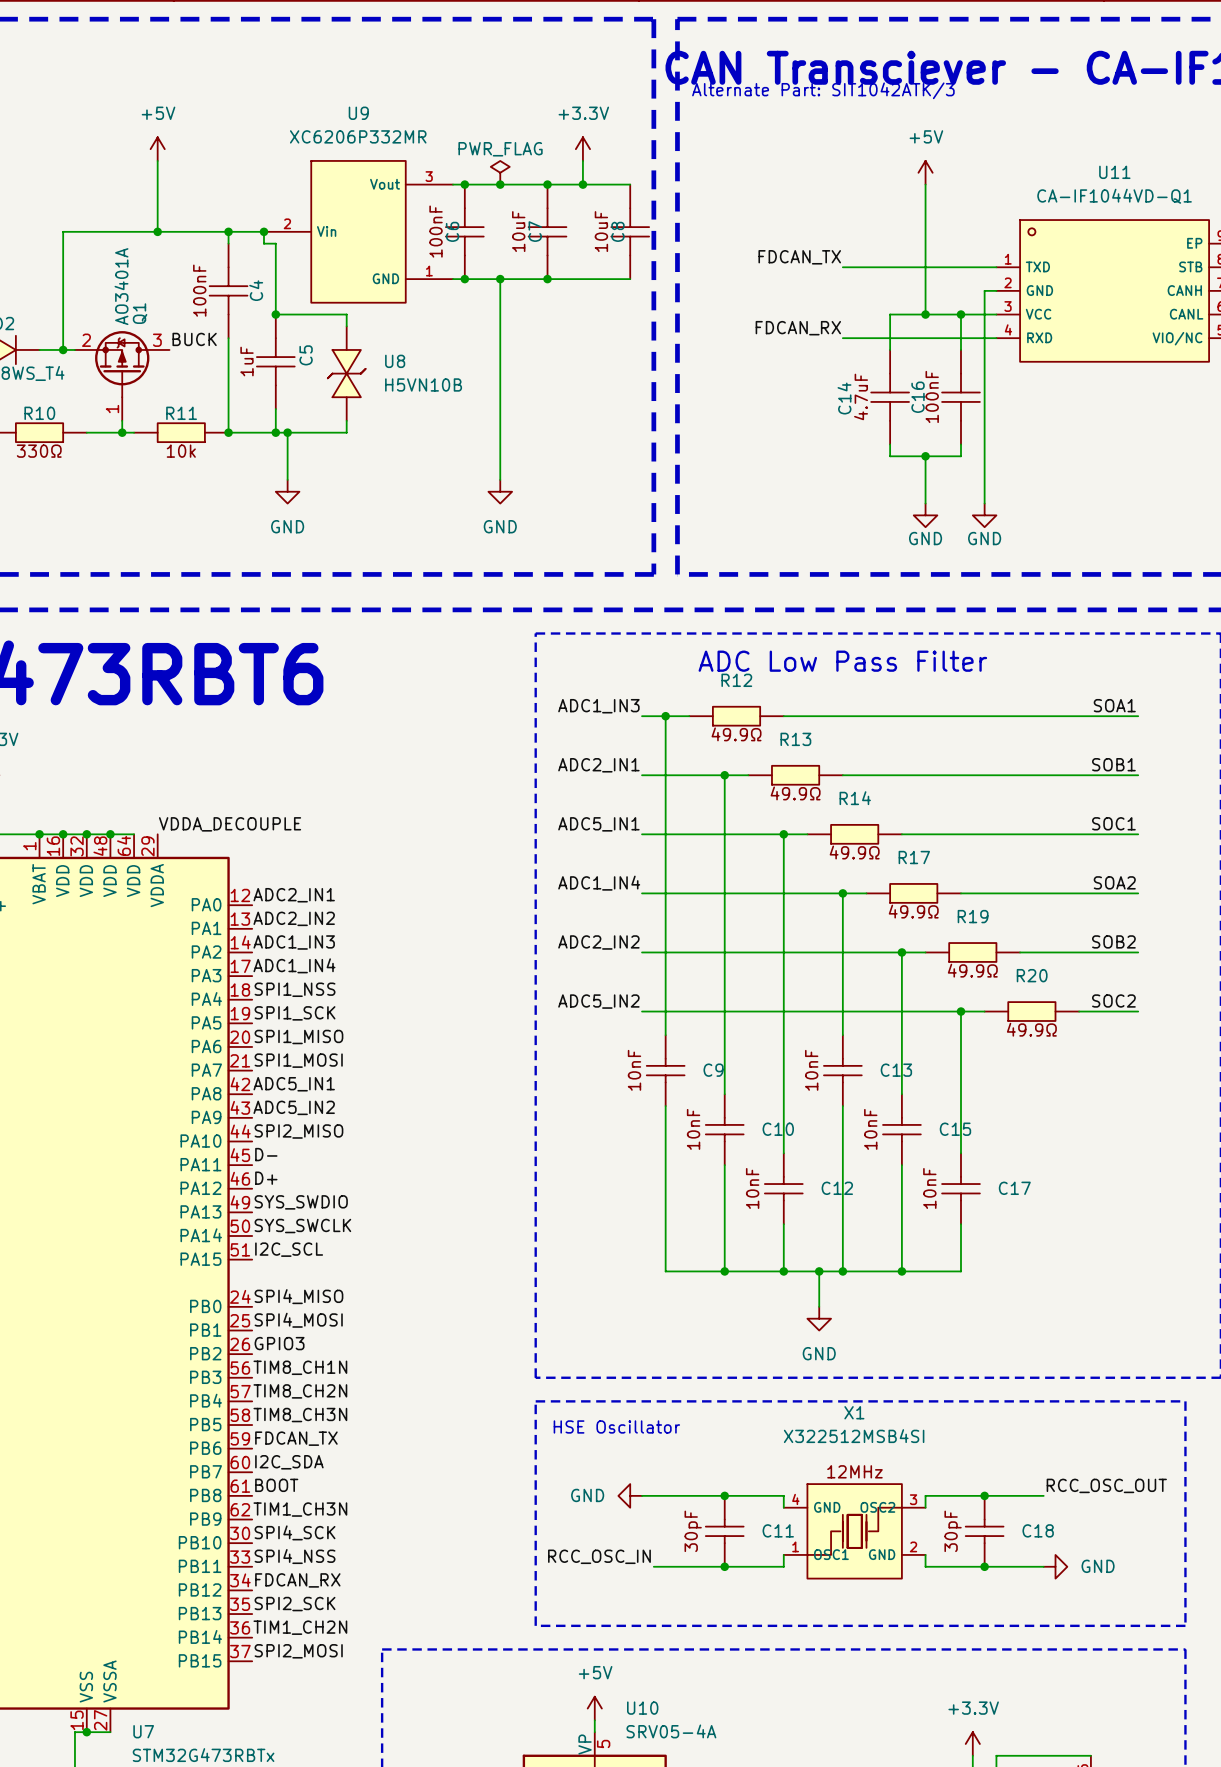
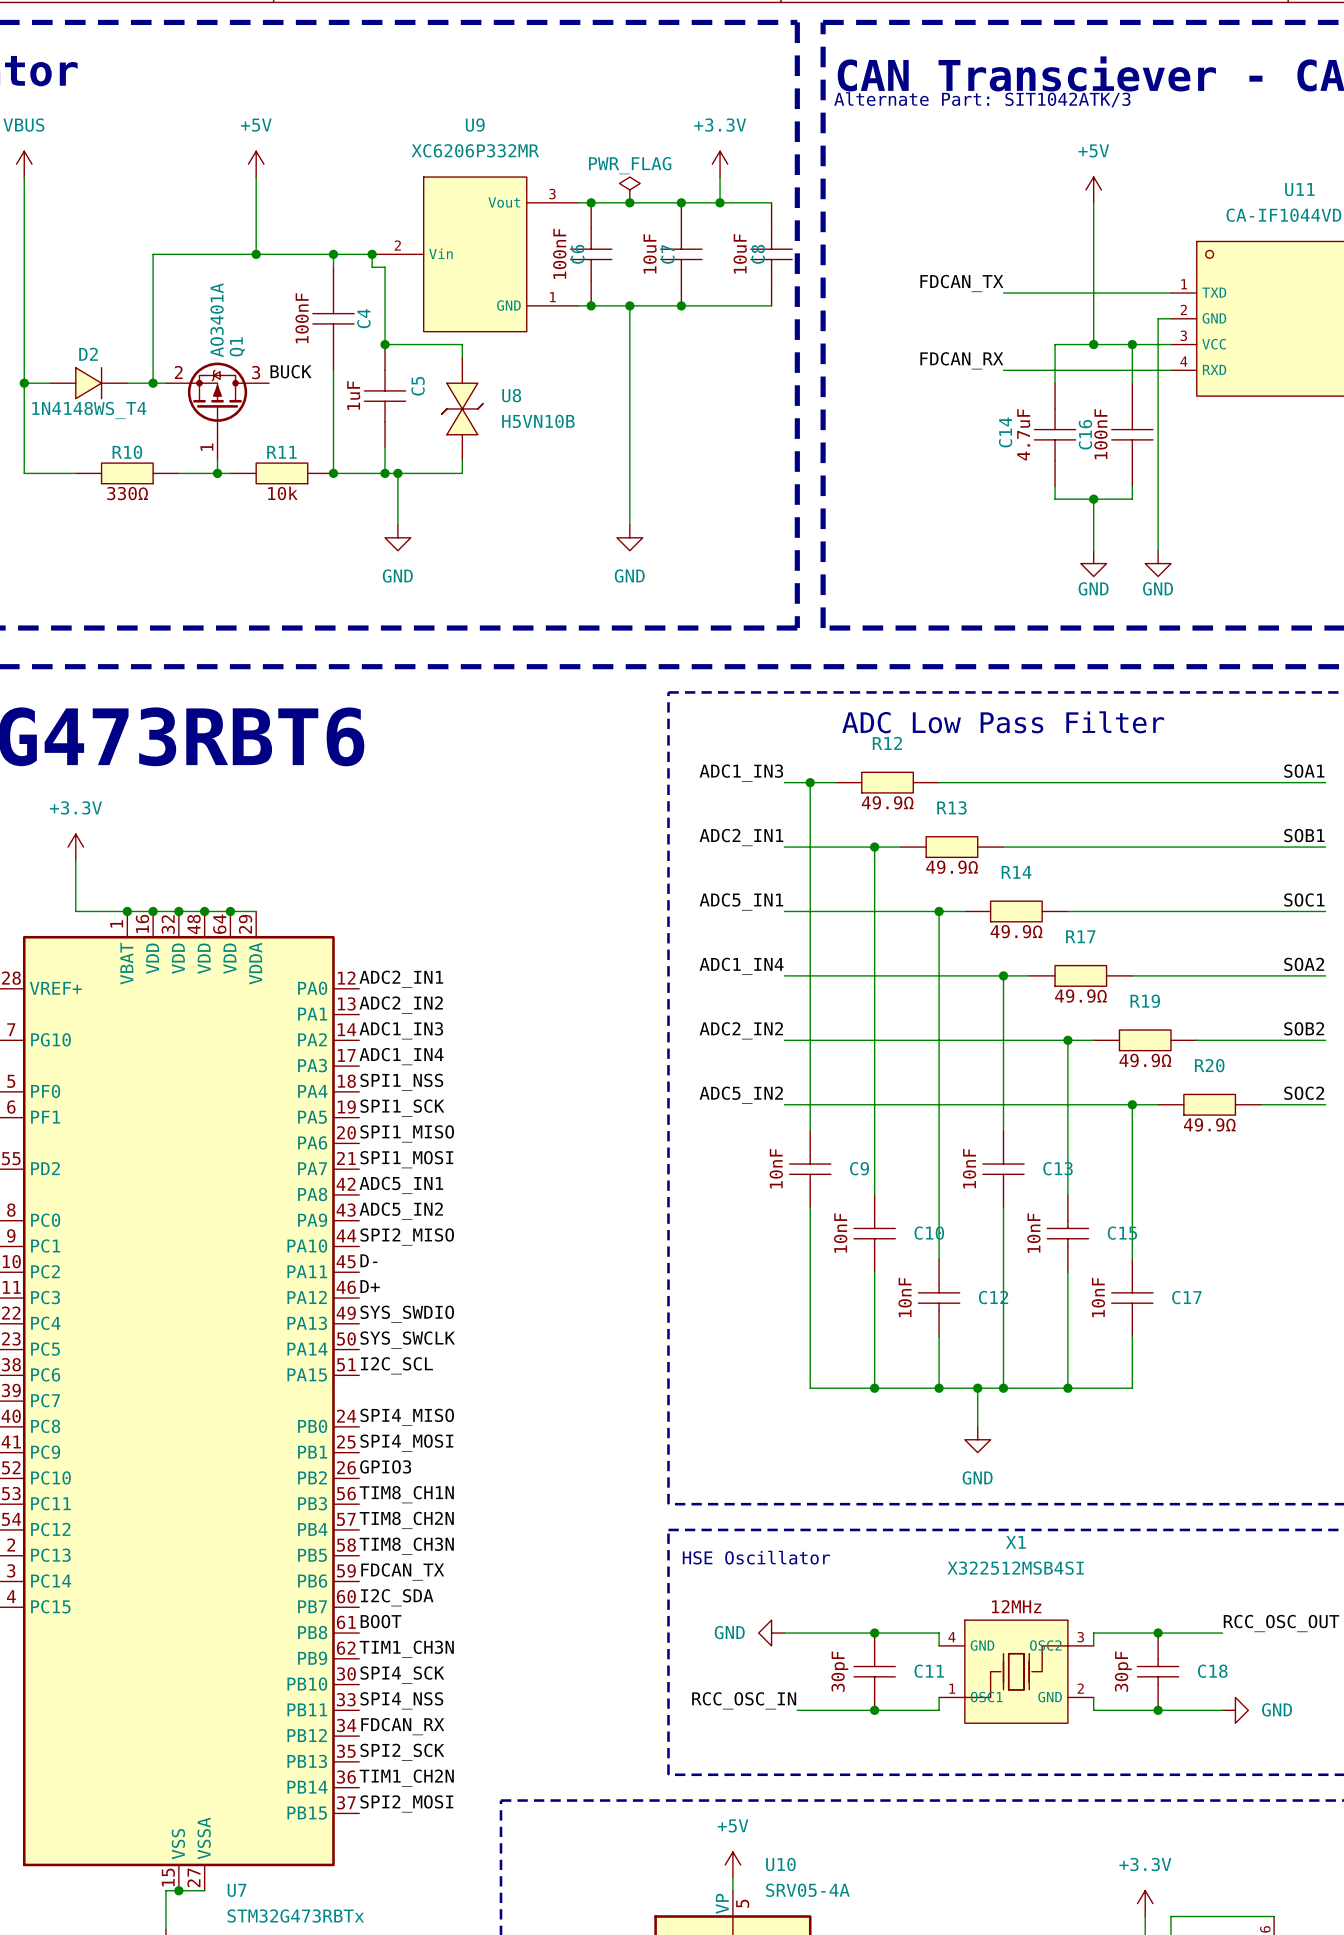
label: VDDA_DECOUPLE (230, 824) -> none
wire: none -> (230, 911) (256, 911)
junction: none -> (230, 911)

